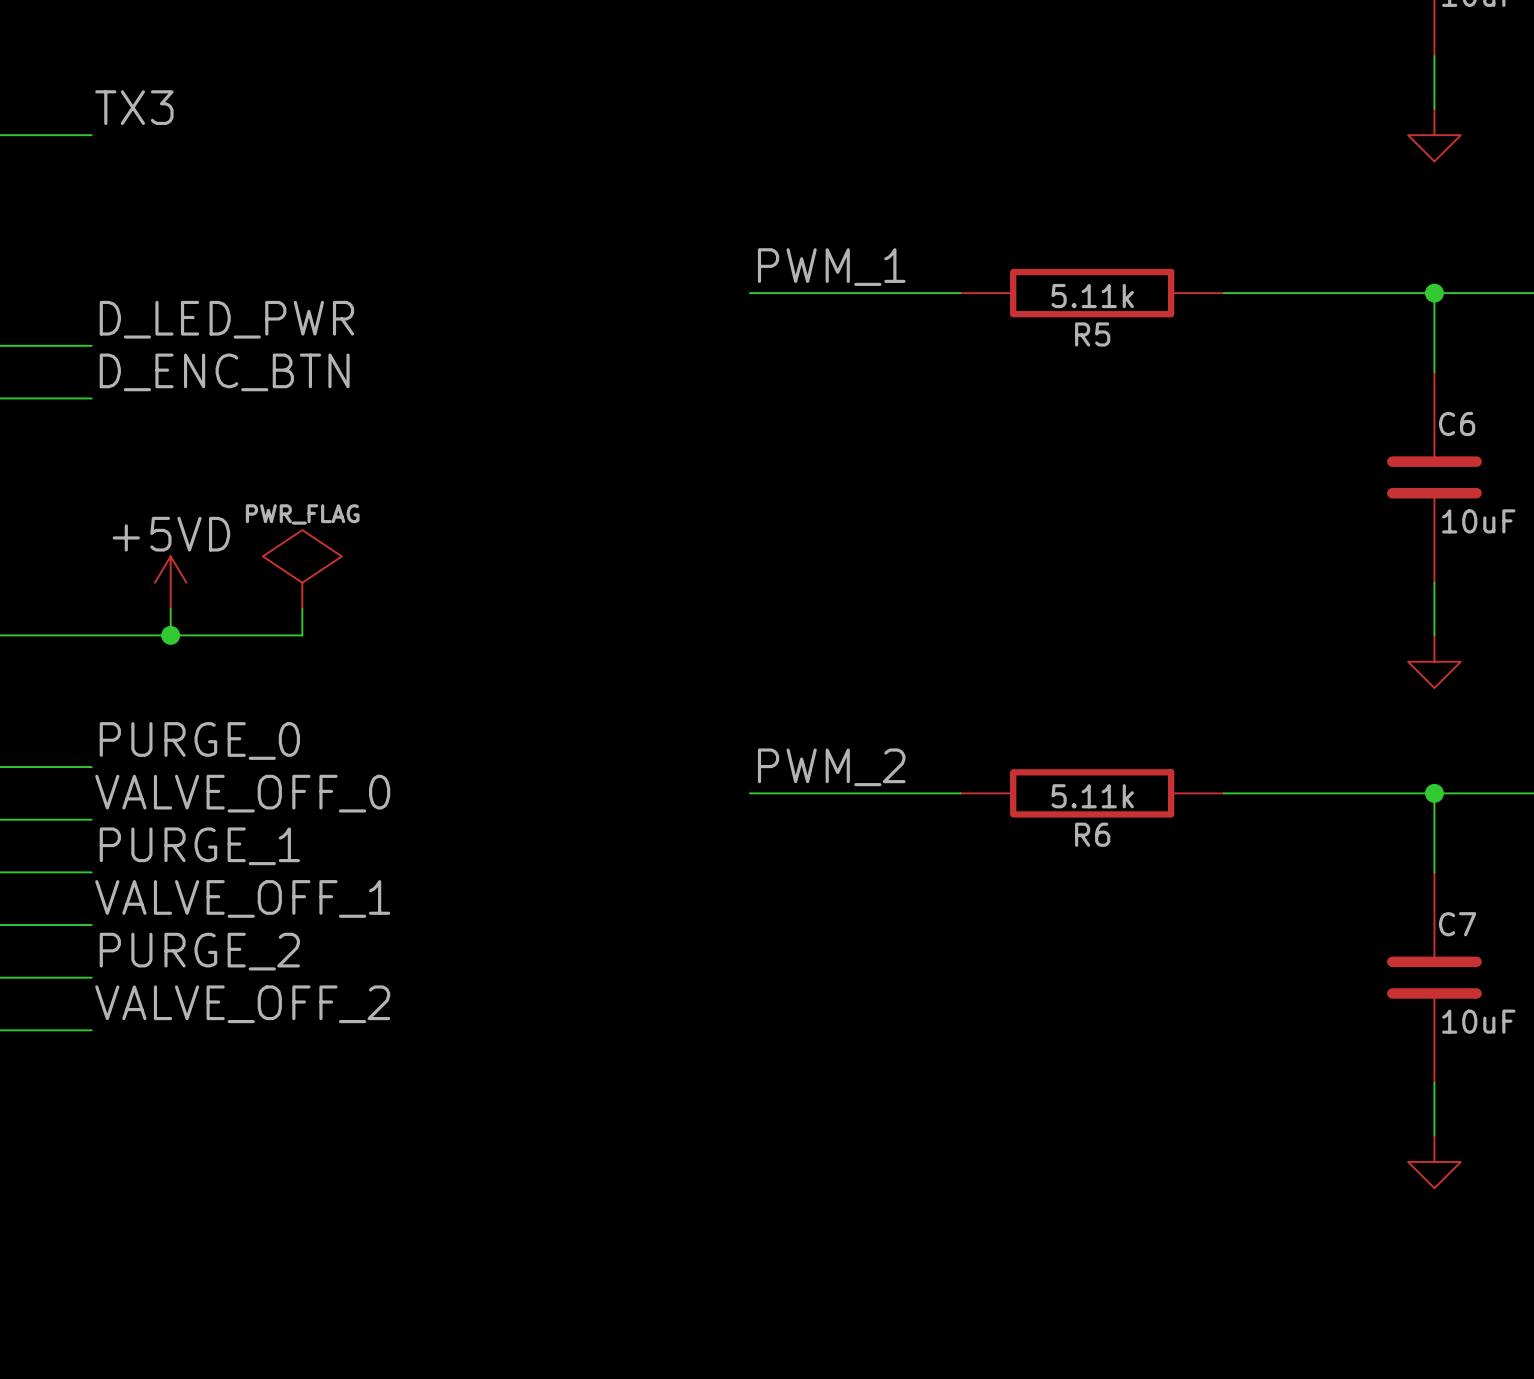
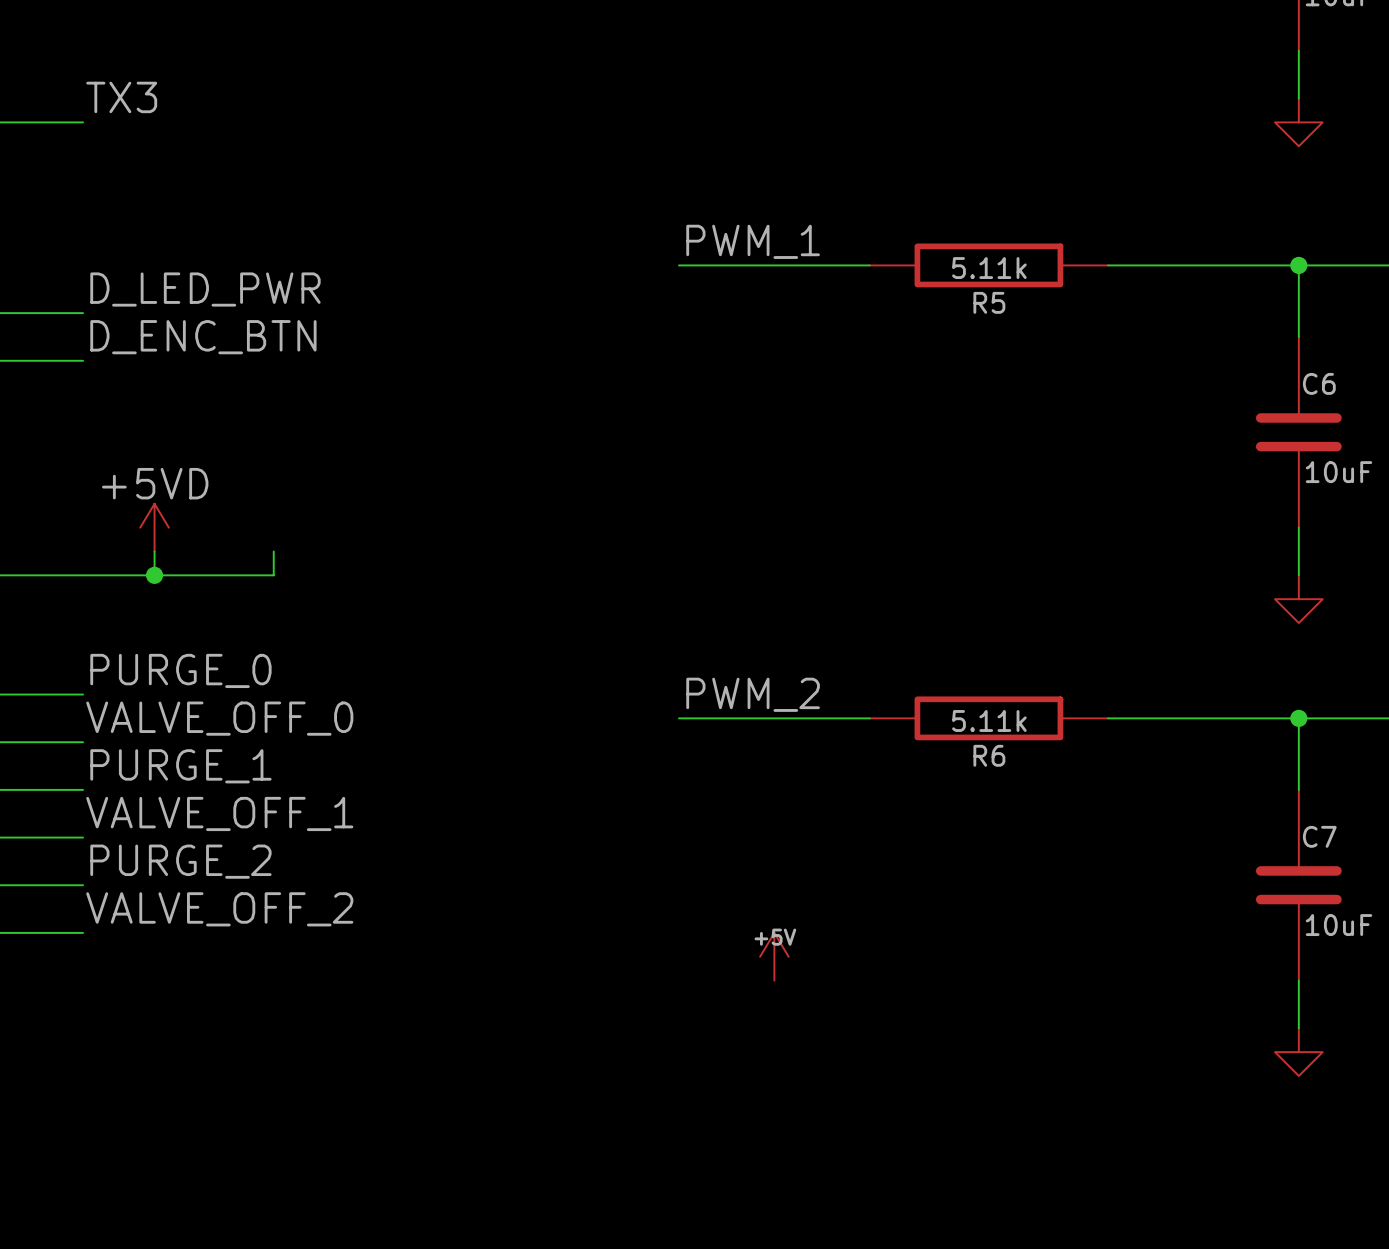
power symbol: PWR_FLAG (302, 569) -> none
power symbol: none -> +5V (774, 956)

